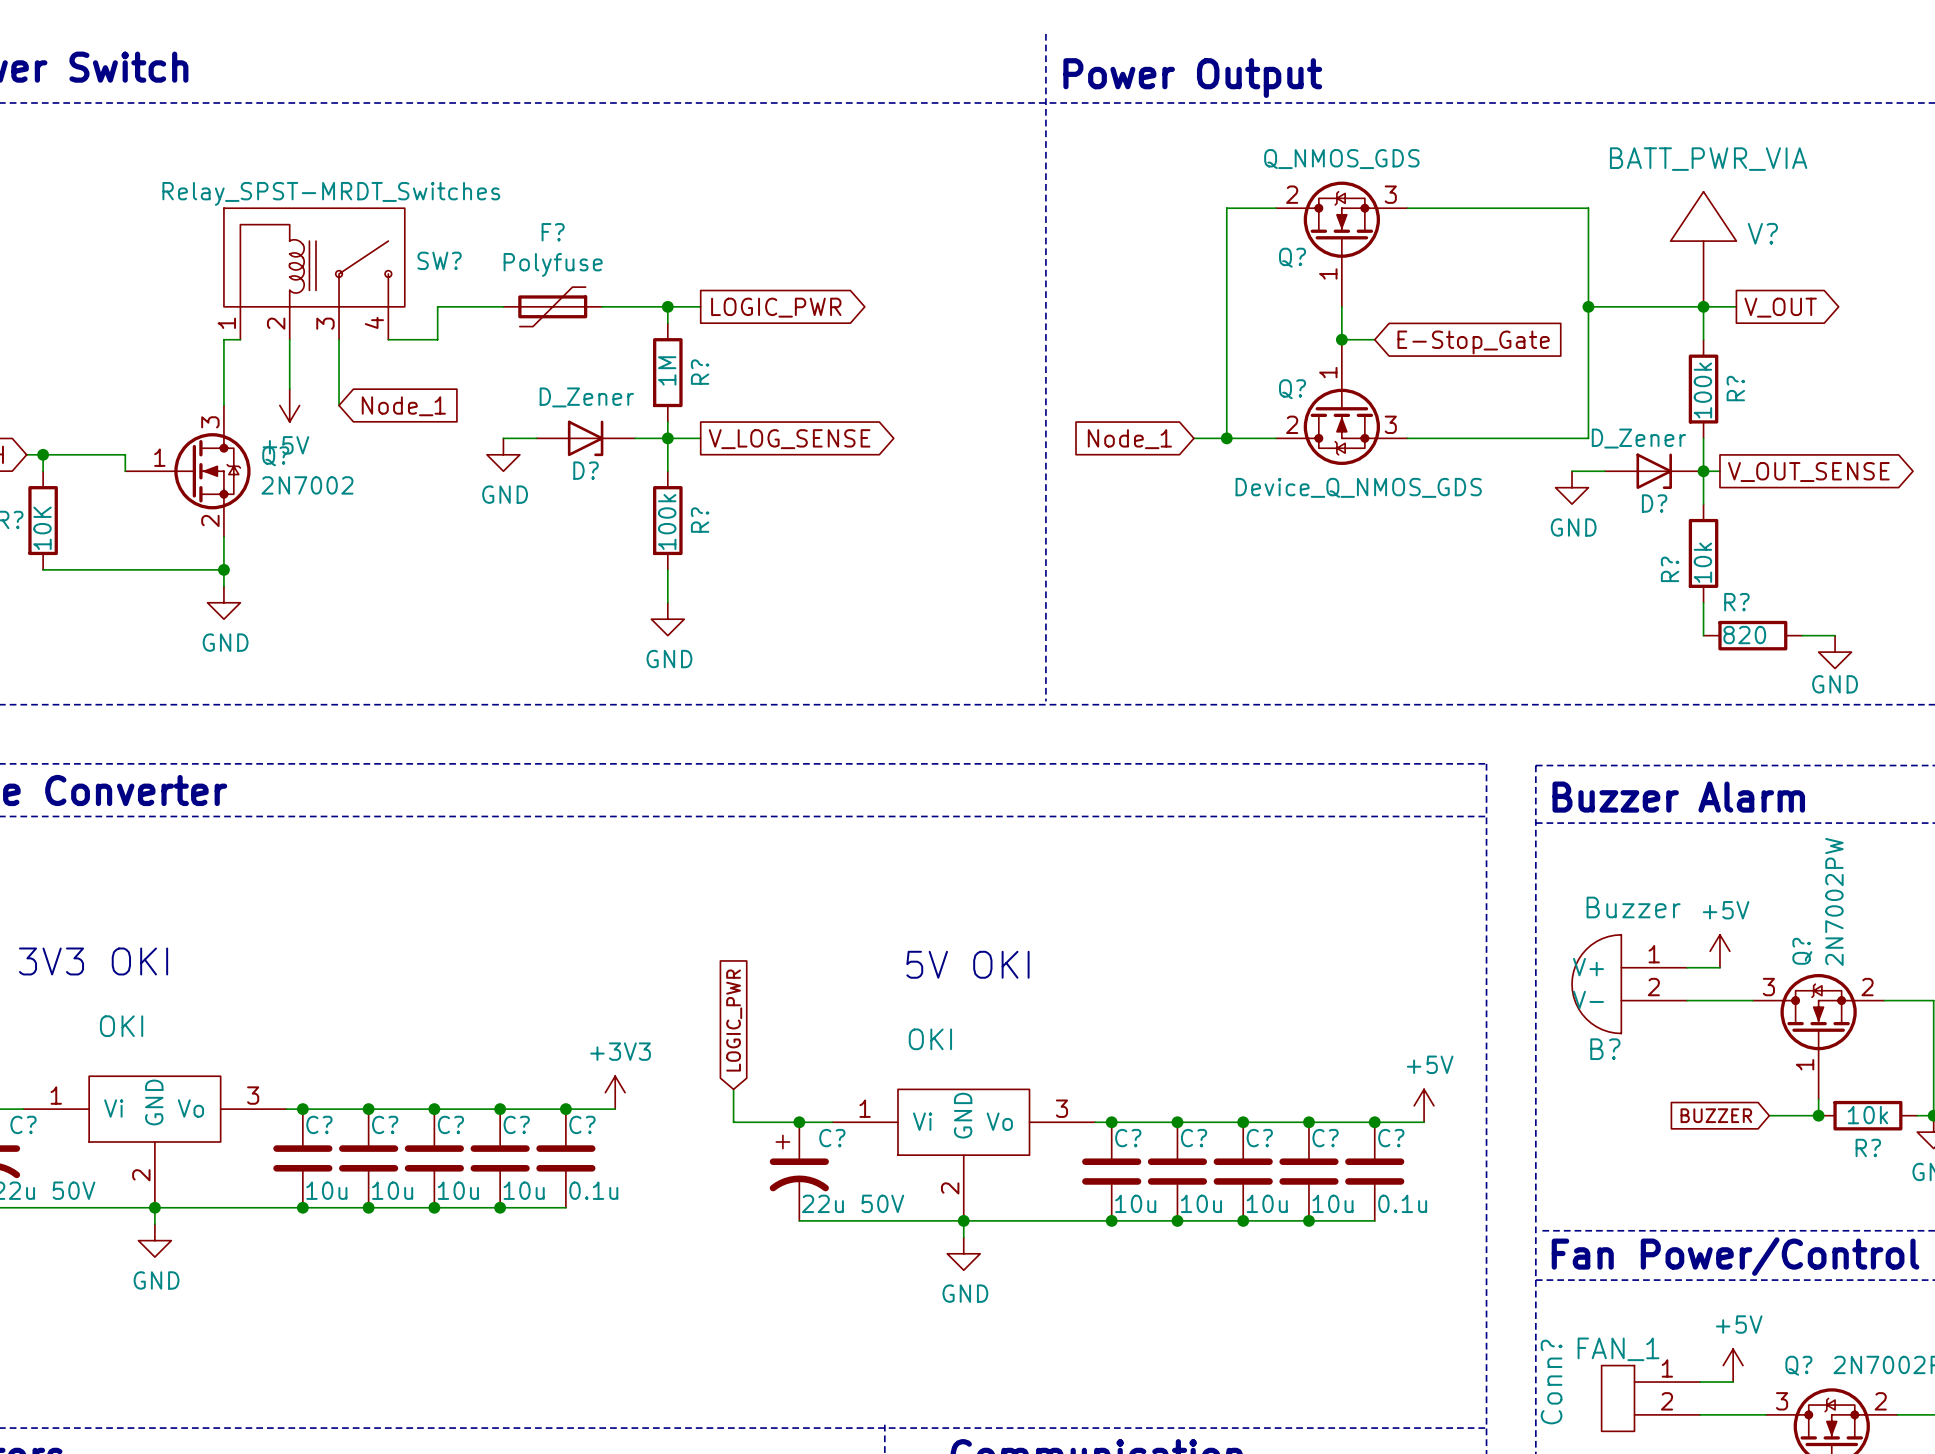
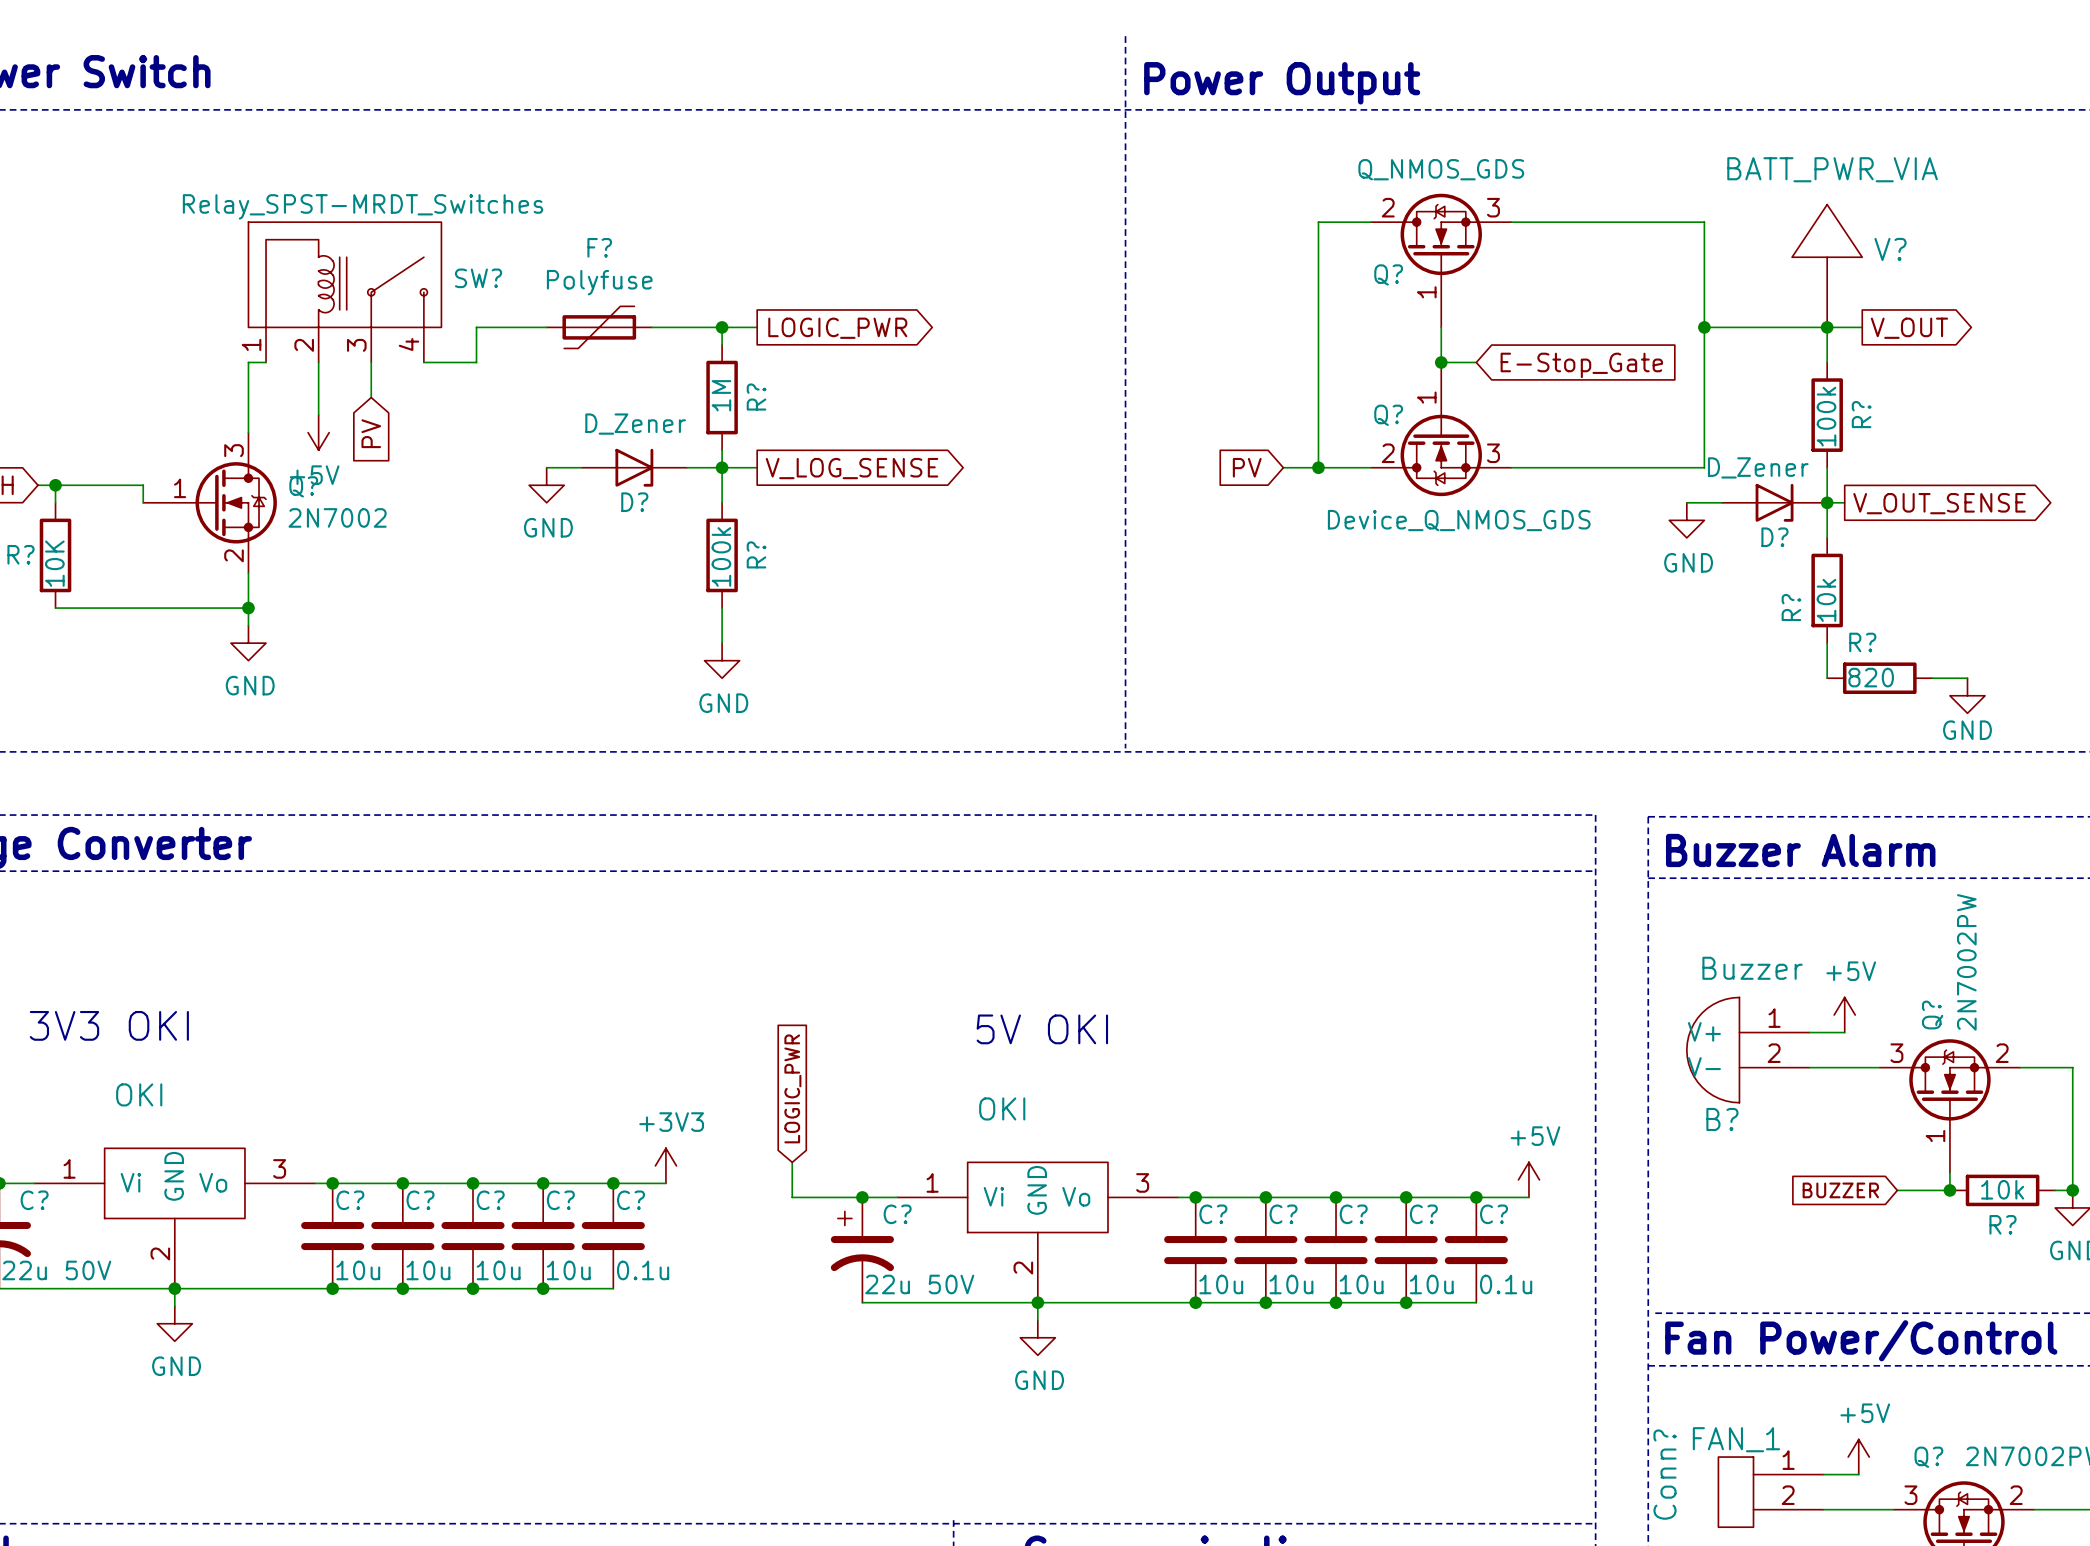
wire: (339, 372) (339, 405) -> none
global label: none -> PV (371, 433)
global label: Node_1 (403, 406) -> none
global label: Node_1 (1129, 439) -> PV (1247, 467)

